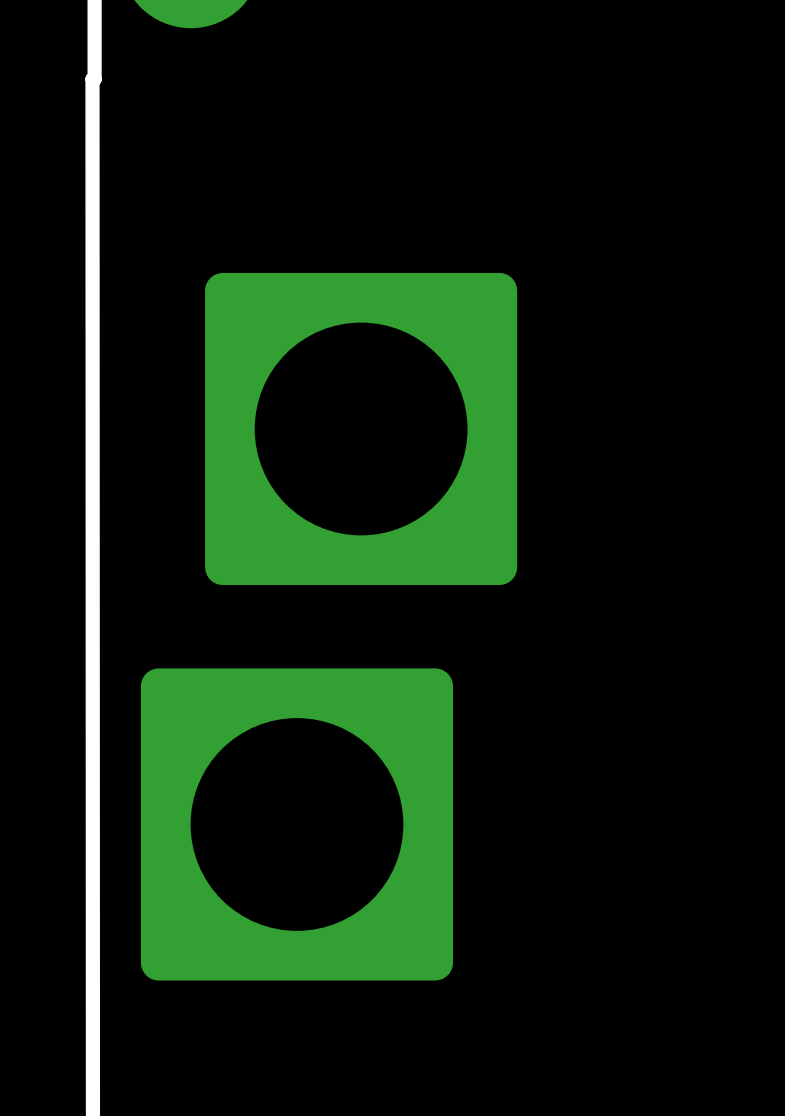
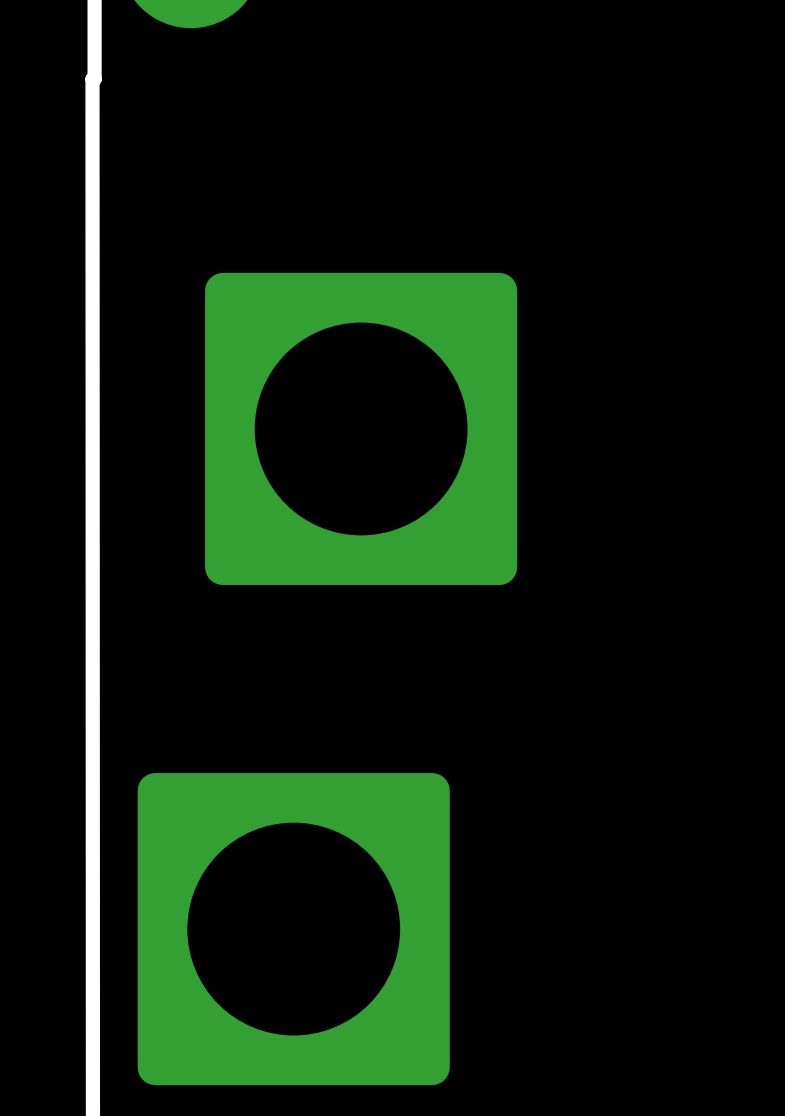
part position: (296, 824) -> (293, 929)

